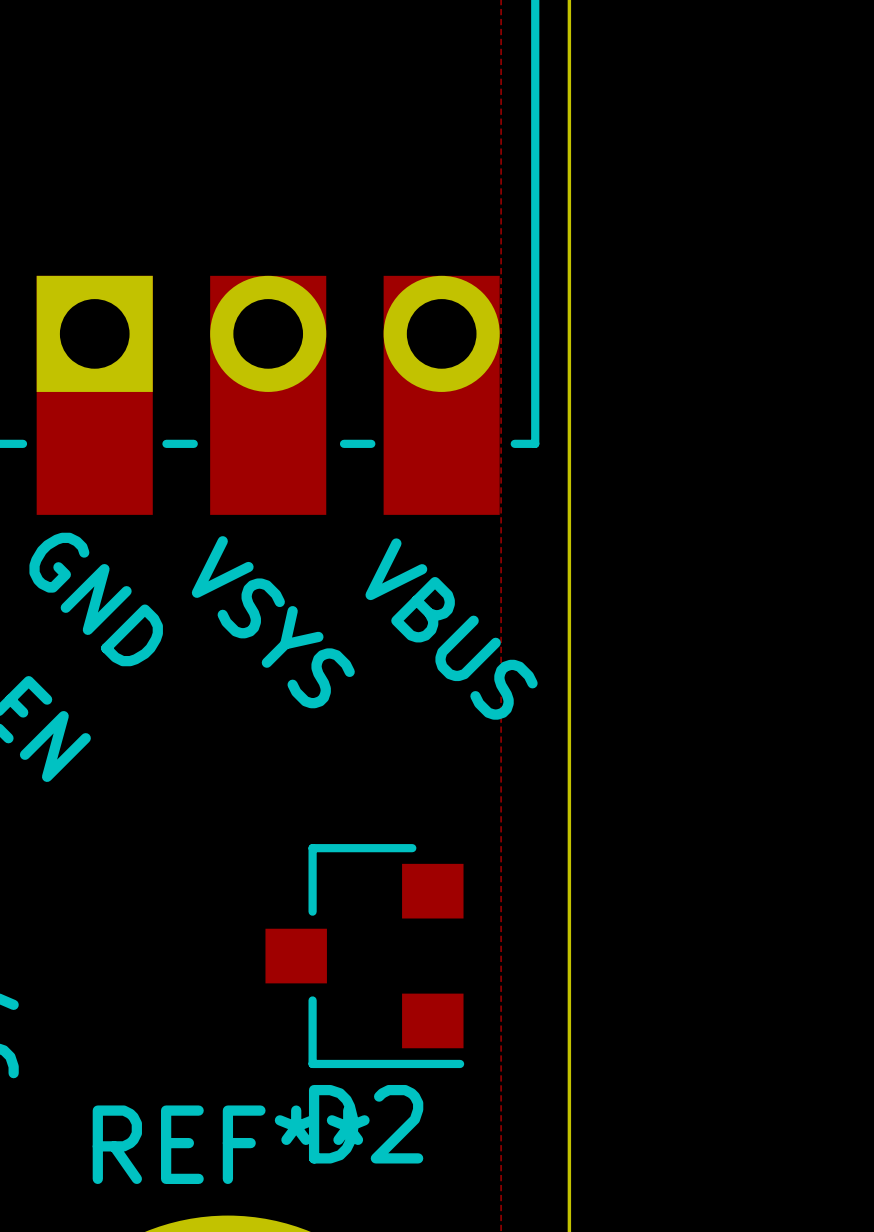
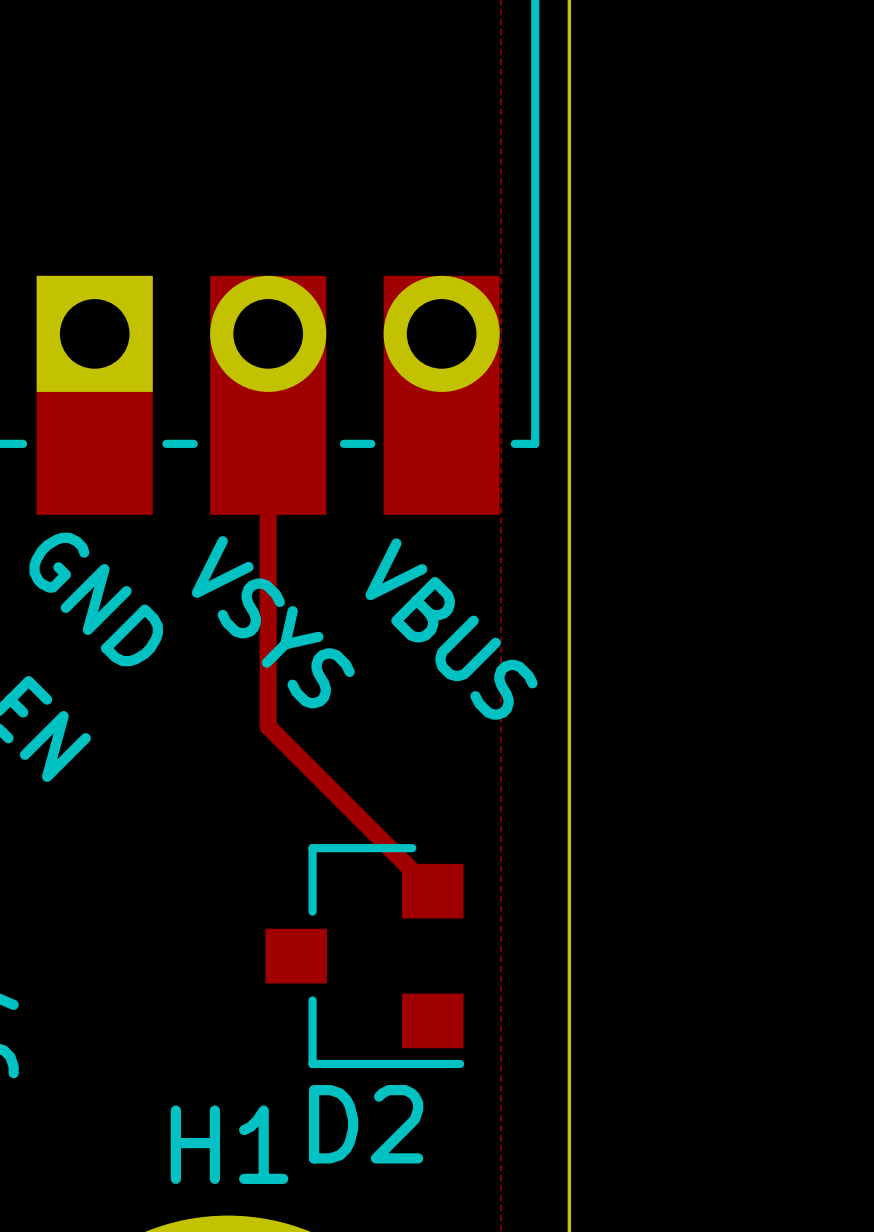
track: none -> (268, 333) (268, 726) (432, 891)
REF** name: REF** (231, 1144) -> H1 (229, 1144)

